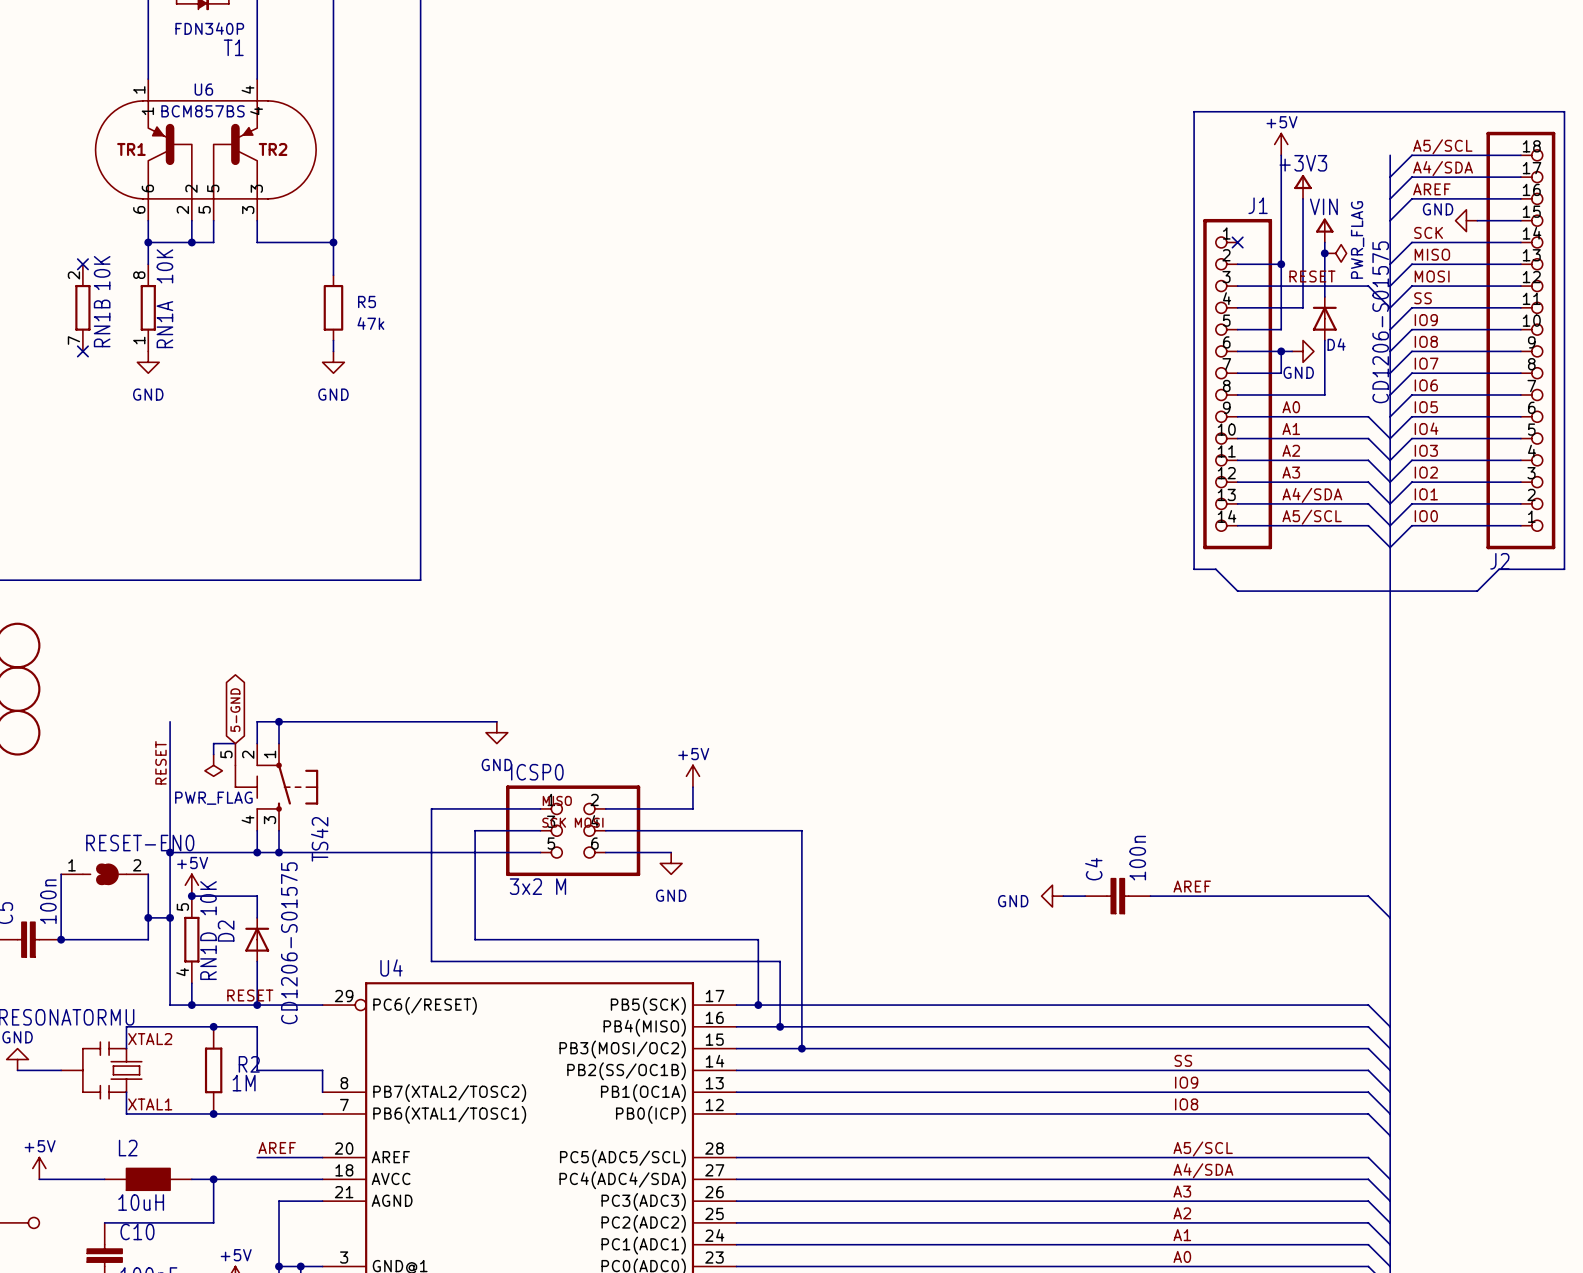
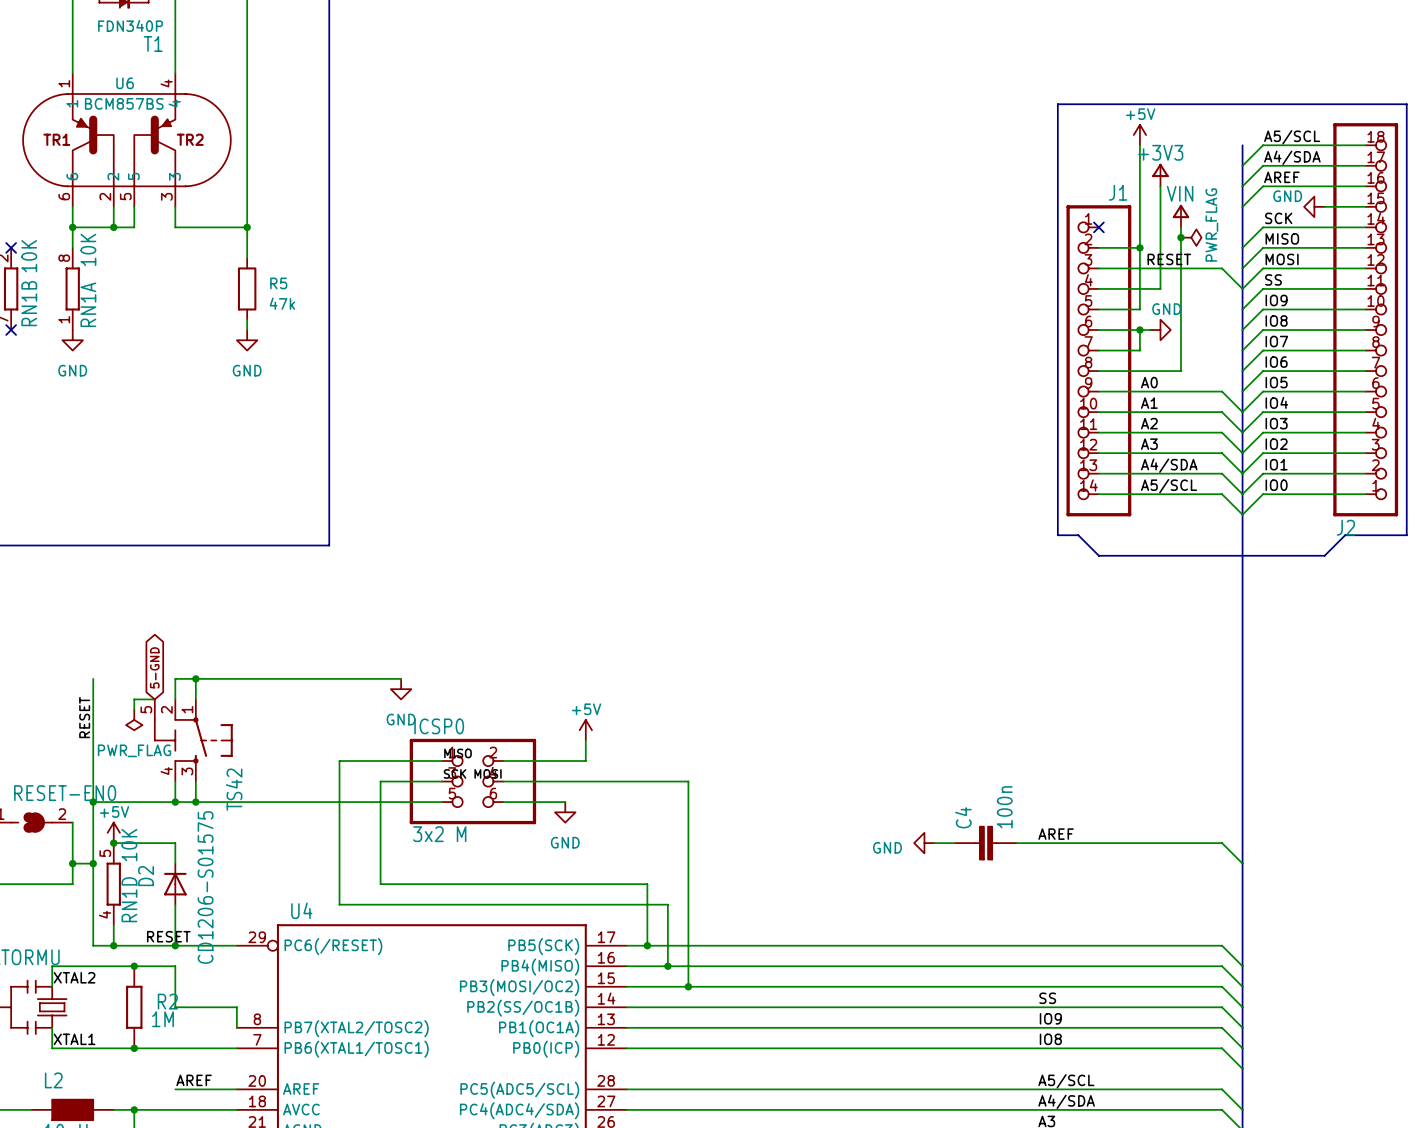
D4: CD1206-S01575 (1324, 318) -> none
power symbol text position: GND (1298, 372) -> GND (1166, 309)

